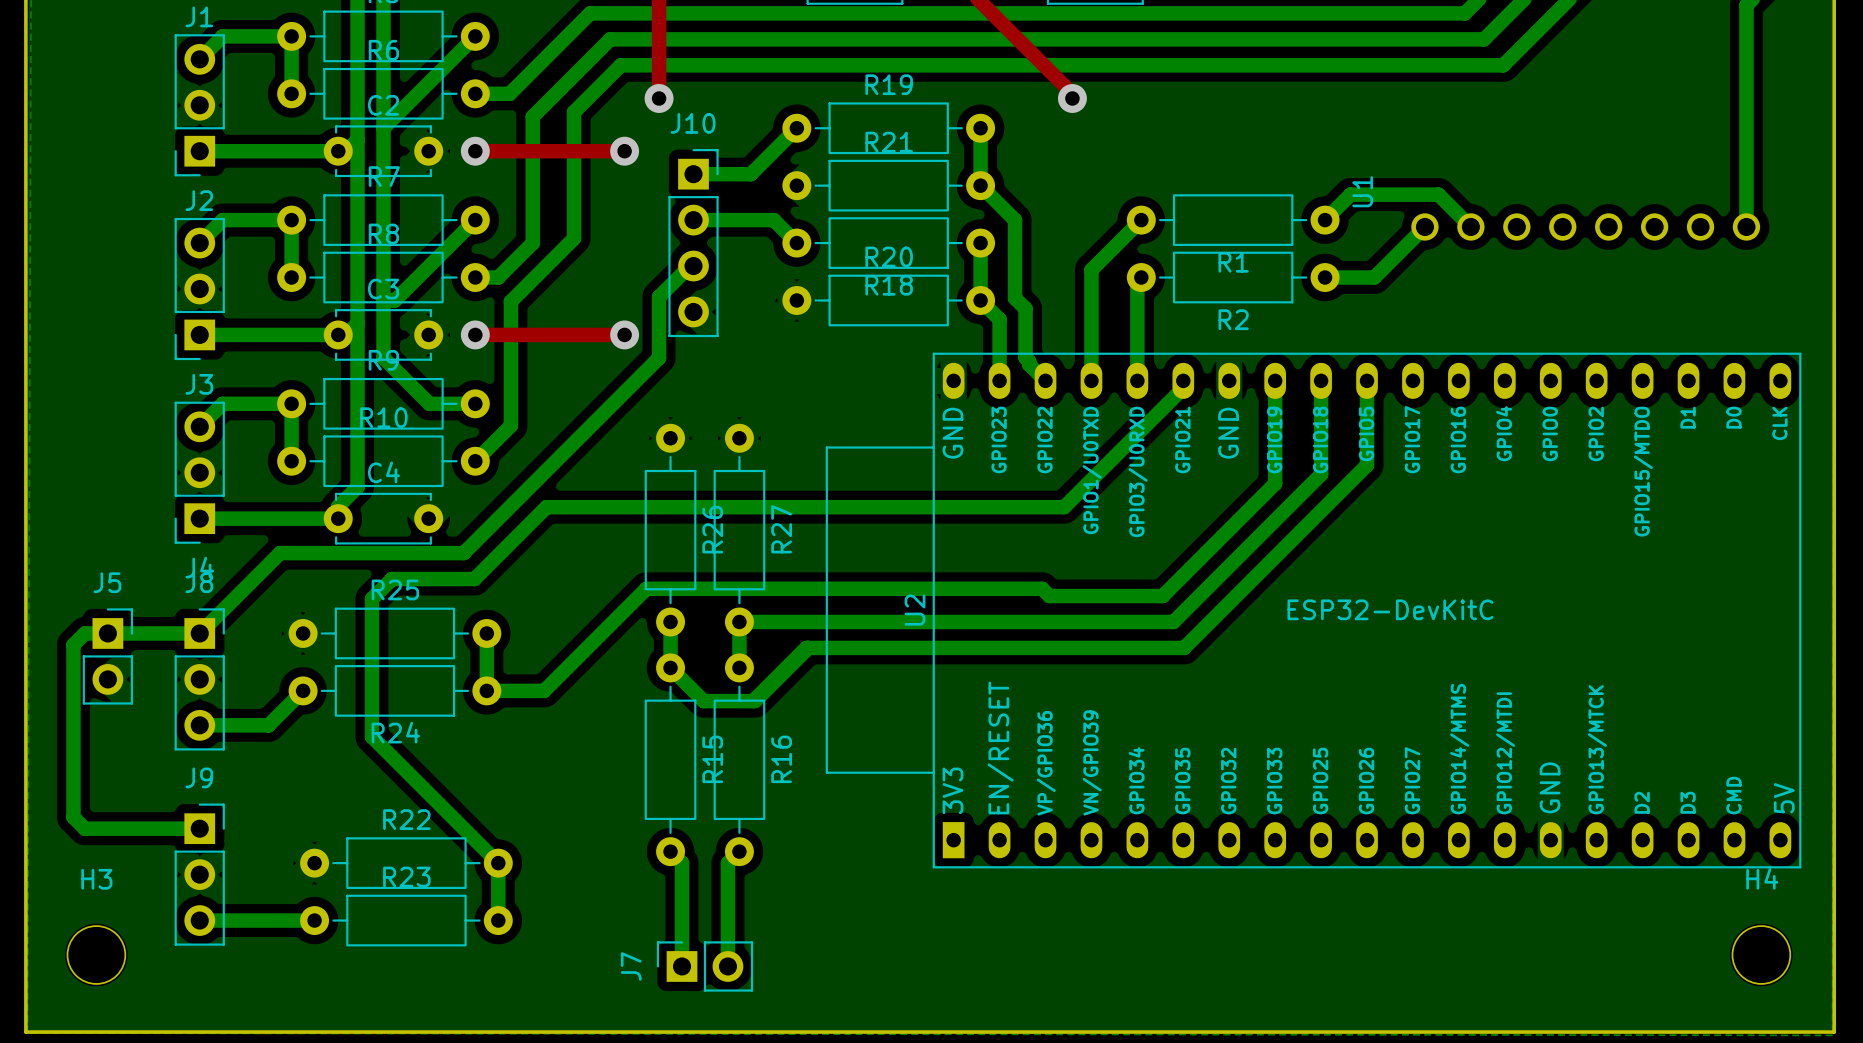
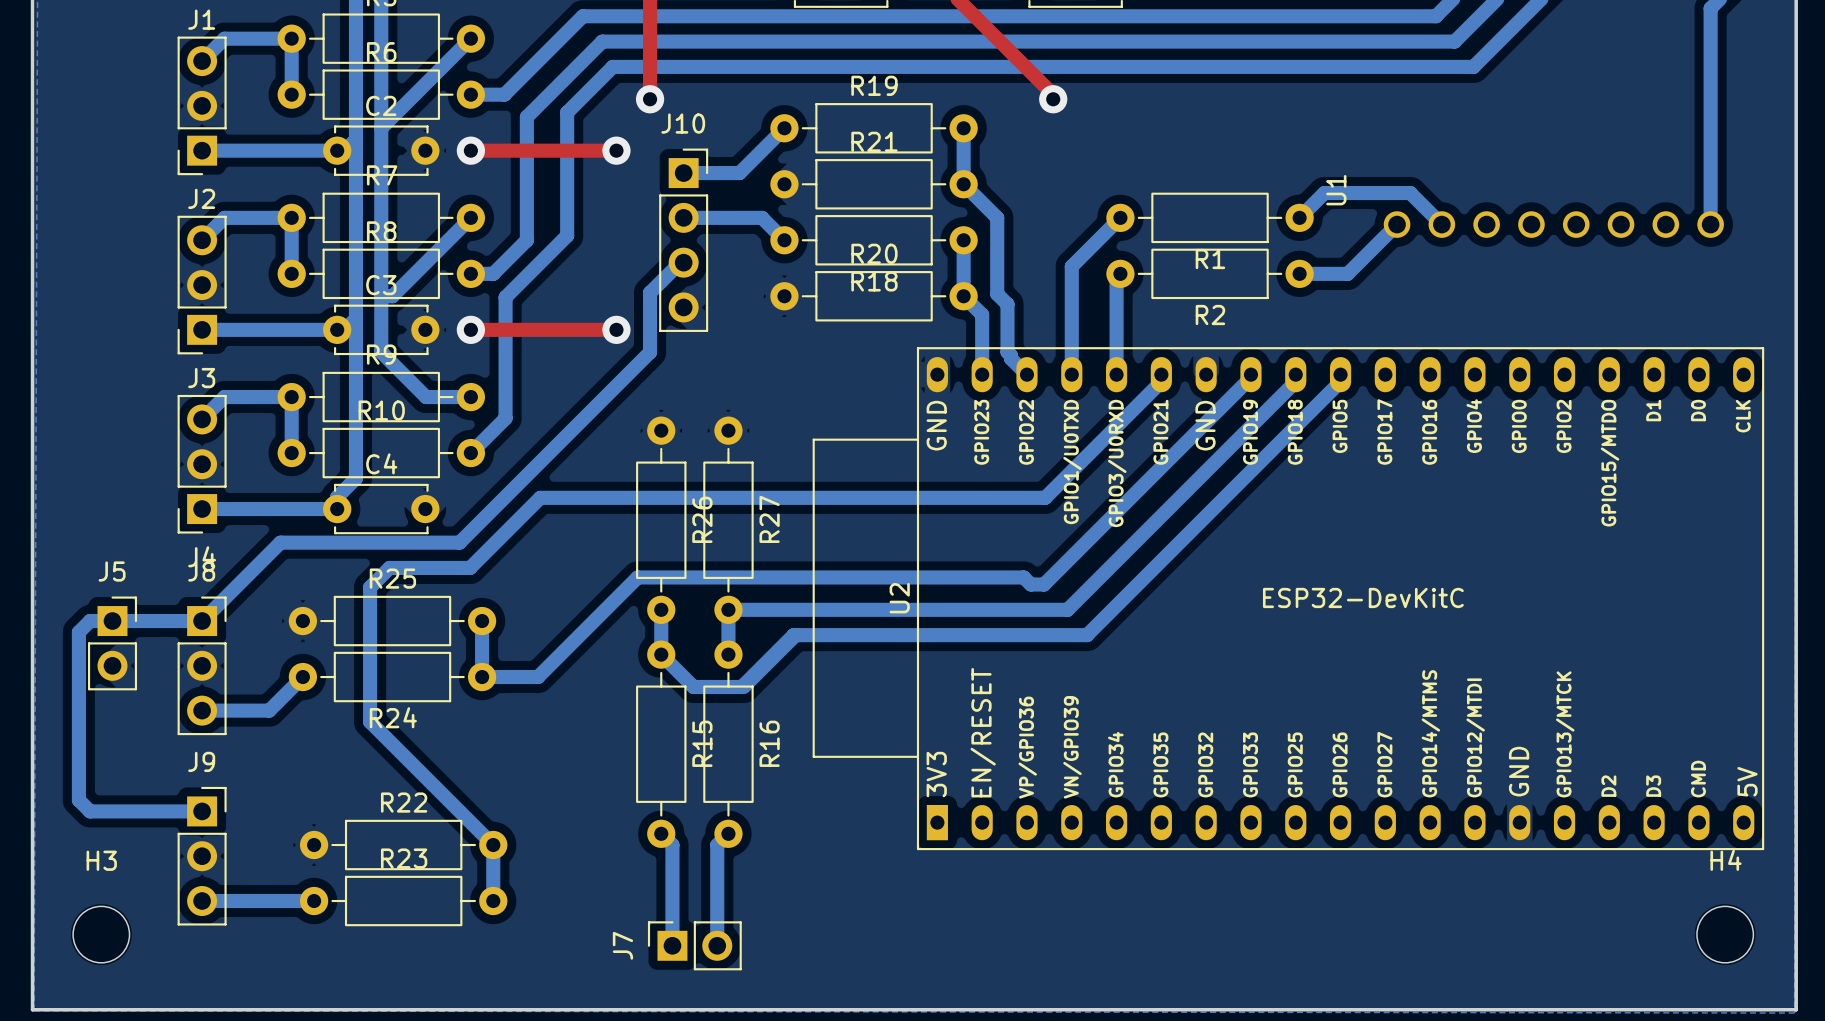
bottom track: (1275, 383) (1275, 483) (1162, 596) (1063, 596) -> (1250, 377) (1044, 584)
bottom track: (1321, 388) (1321, 474) (1173, 622) (1087, 622) -> (1295, 381) (1067, 609)
bottom track: (1367, 388) (1367, 465) (1184, 647) (1107, 647) -> (1340, 381) (1087, 635)

